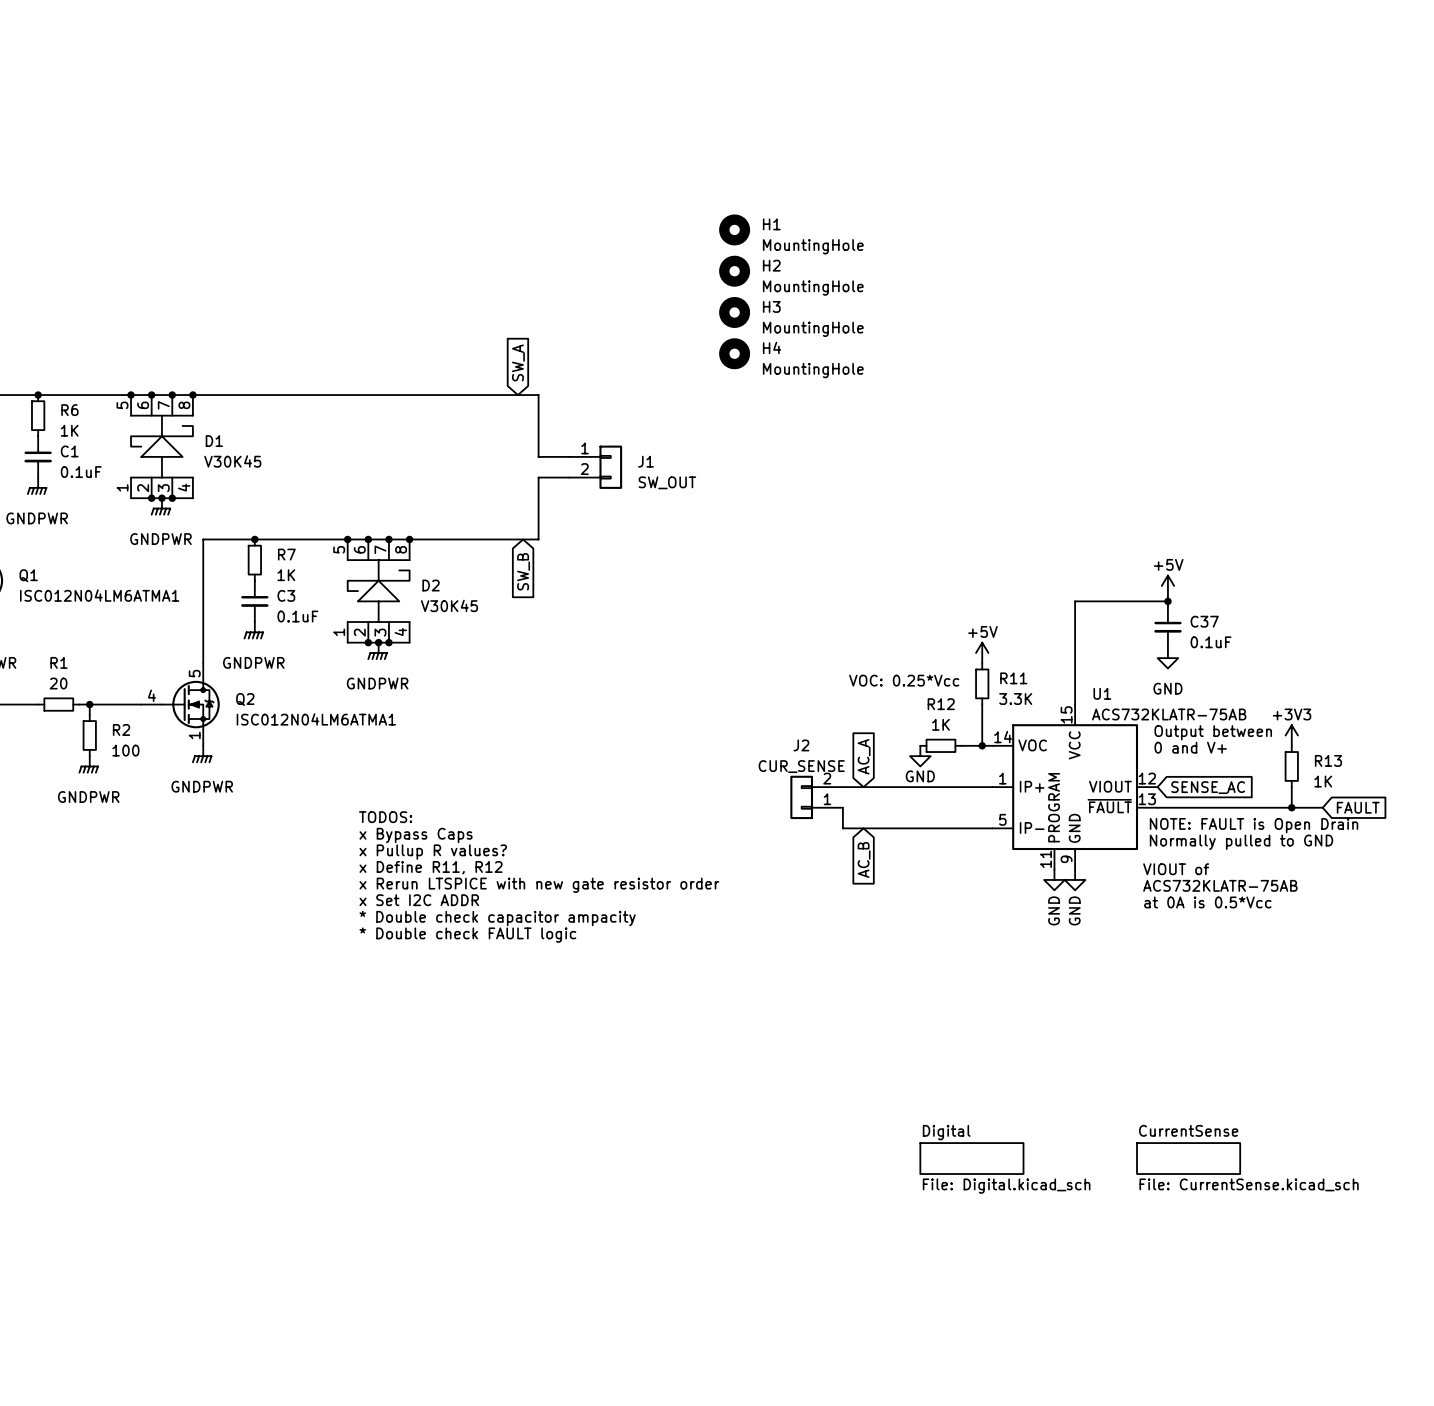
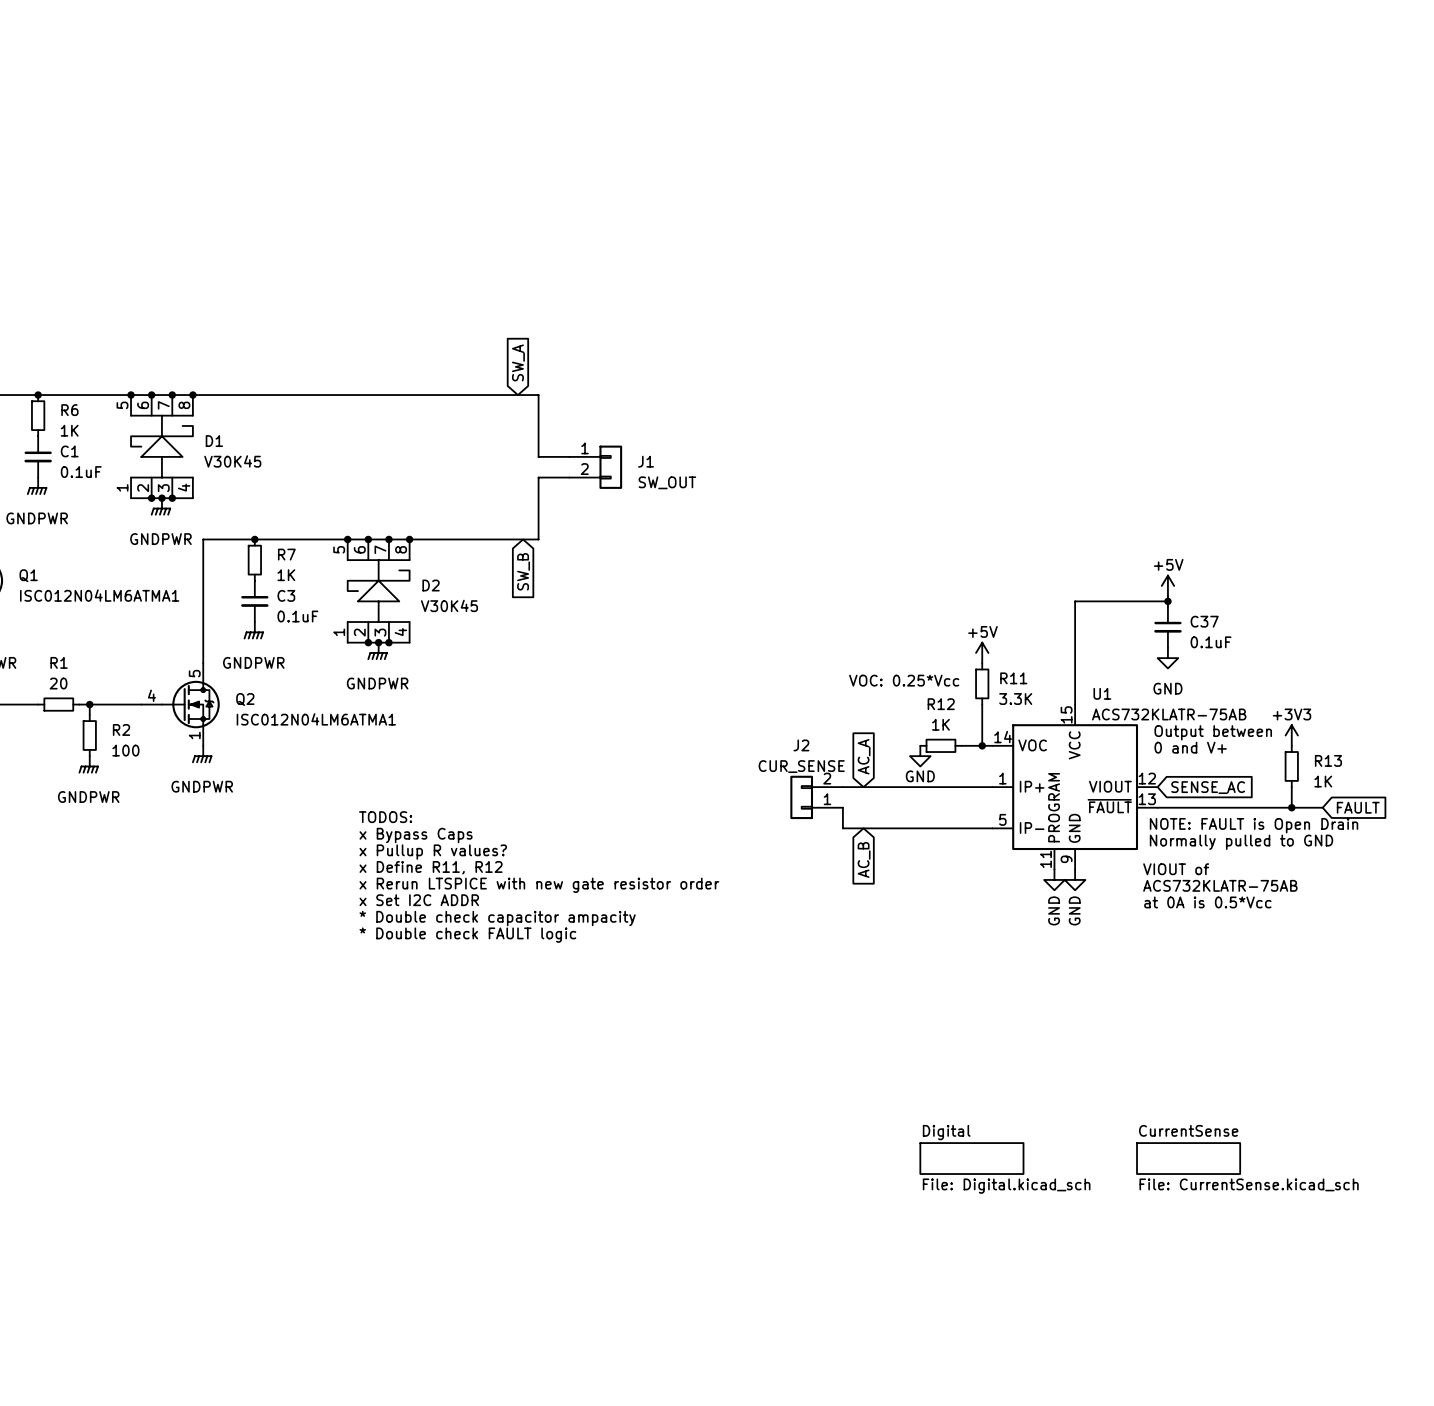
H1: MountingHole (734, 229) -> none
H2: MountingHole (734, 271) -> none
H3: MountingHole (734, 312) -> none
H4: MountingHole (734, 353) -> none

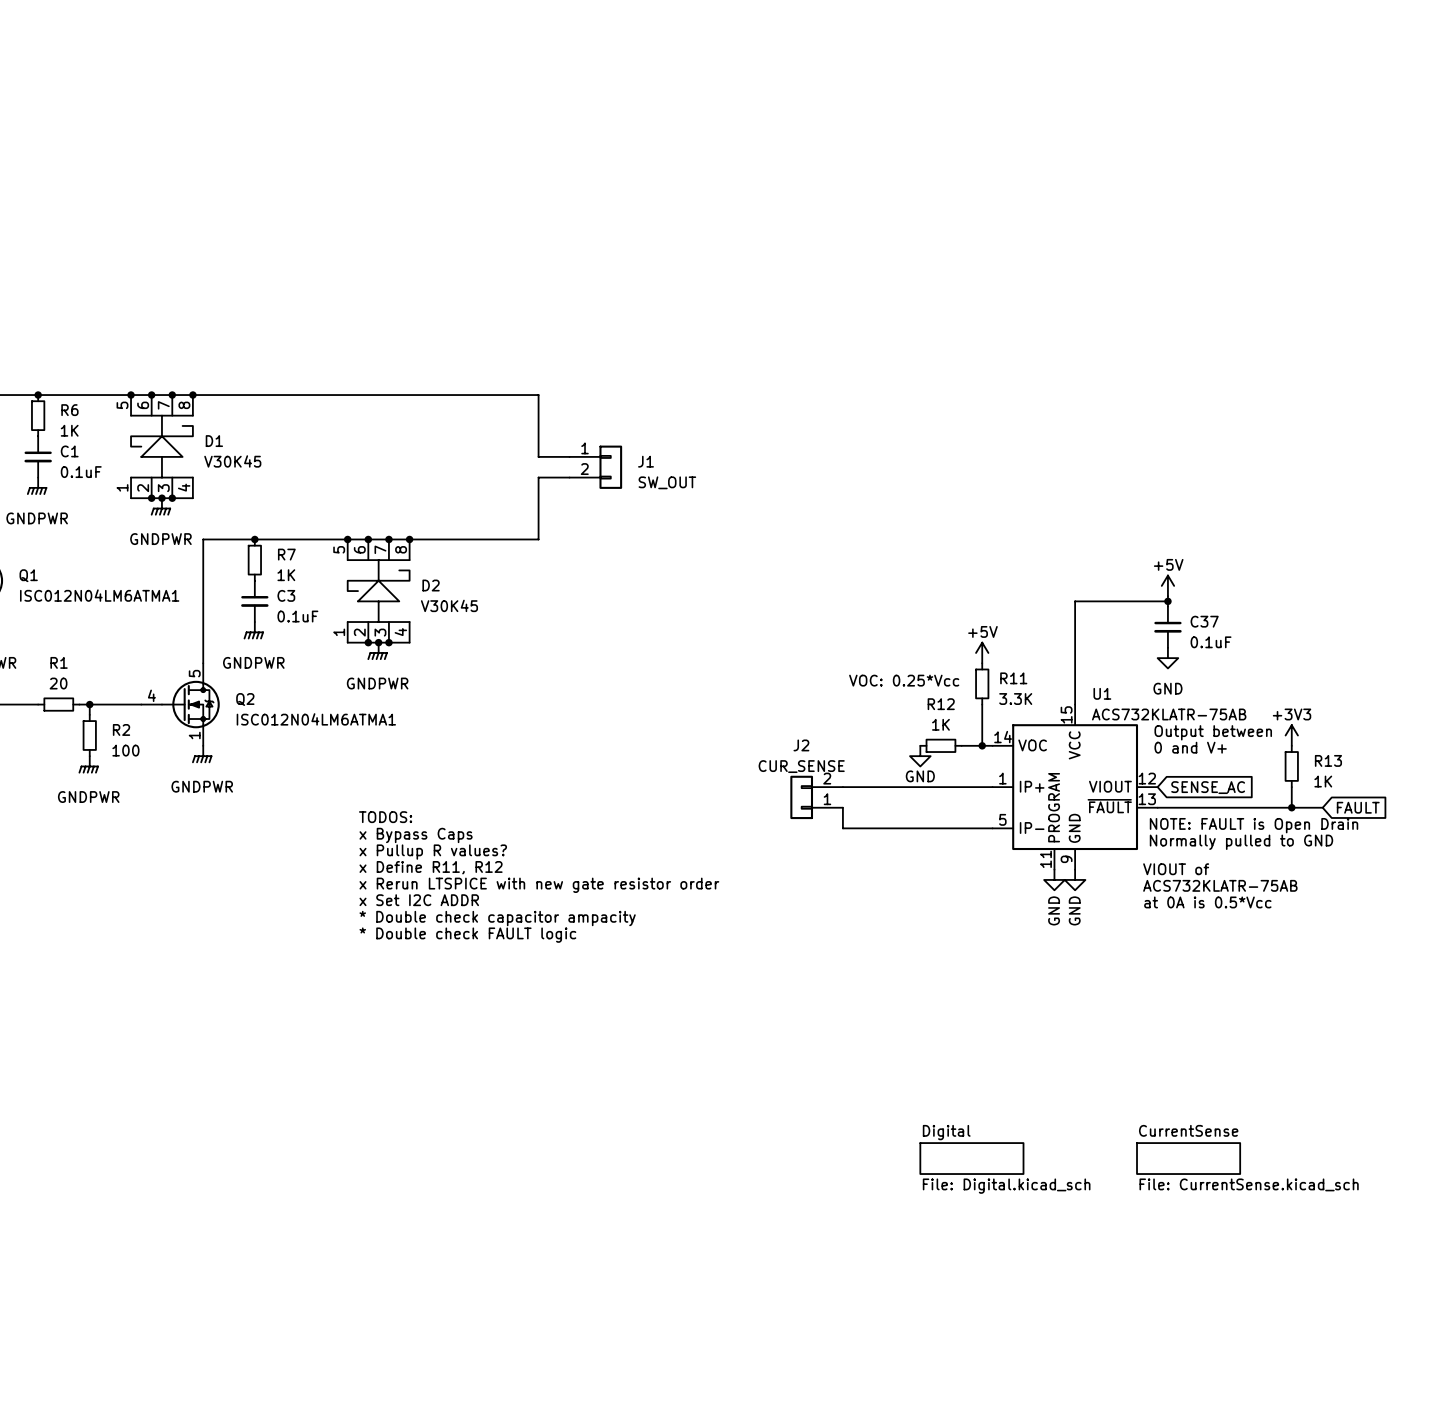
global label: SW_A (518, 362) -> none
global label: SW_B (523, 571) -> none
global label: AC_A (864, 756) -> none
global label: AC_B (864, 859) -> none

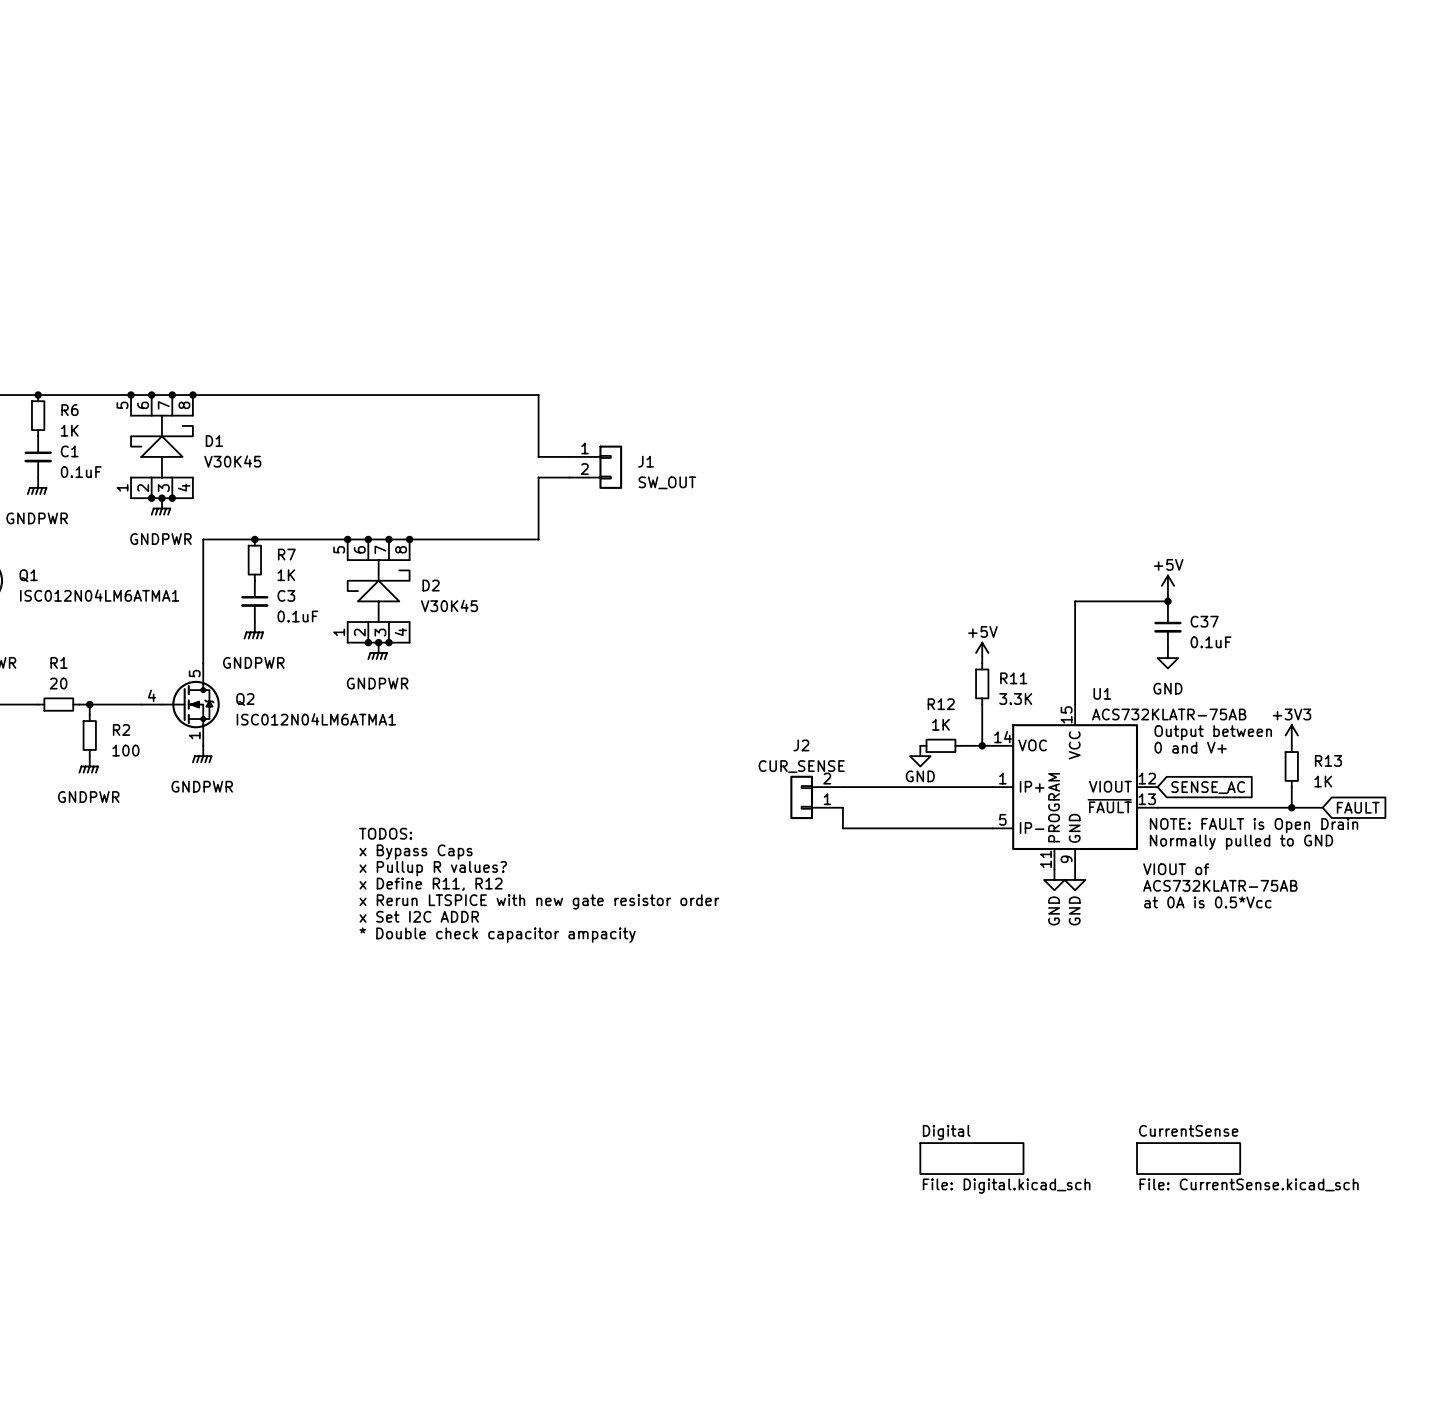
text: VOC: 0.25*Vcc (904, 680) -> none
text: TODOS: (385, 817) -> none
text: x Bypass Caps (416, 835) -> TODOS: (385, 833)
text: x Pullup R values? (433, 852) -> x Bypass Caps (416, 852)
text: x Define R11, R12 (431, 867) -> x Pullup R values? (433, 868)
text: x Rerun LTSPICE with new gate resistor order (539, 885) -> x Define R11, R12 (431, 884)
text: x Set I2C ADDR (419, 900) -> x Rerun LTSPICE with new gate resistor order (539, 901)
text: * Double check capacitor ampacity (497, 918) -> x Set I2C ADDR (419, 916)
text: * Double check FAULT logic (467, 935) -> * Double check capacitor ampacity (497, 935)

